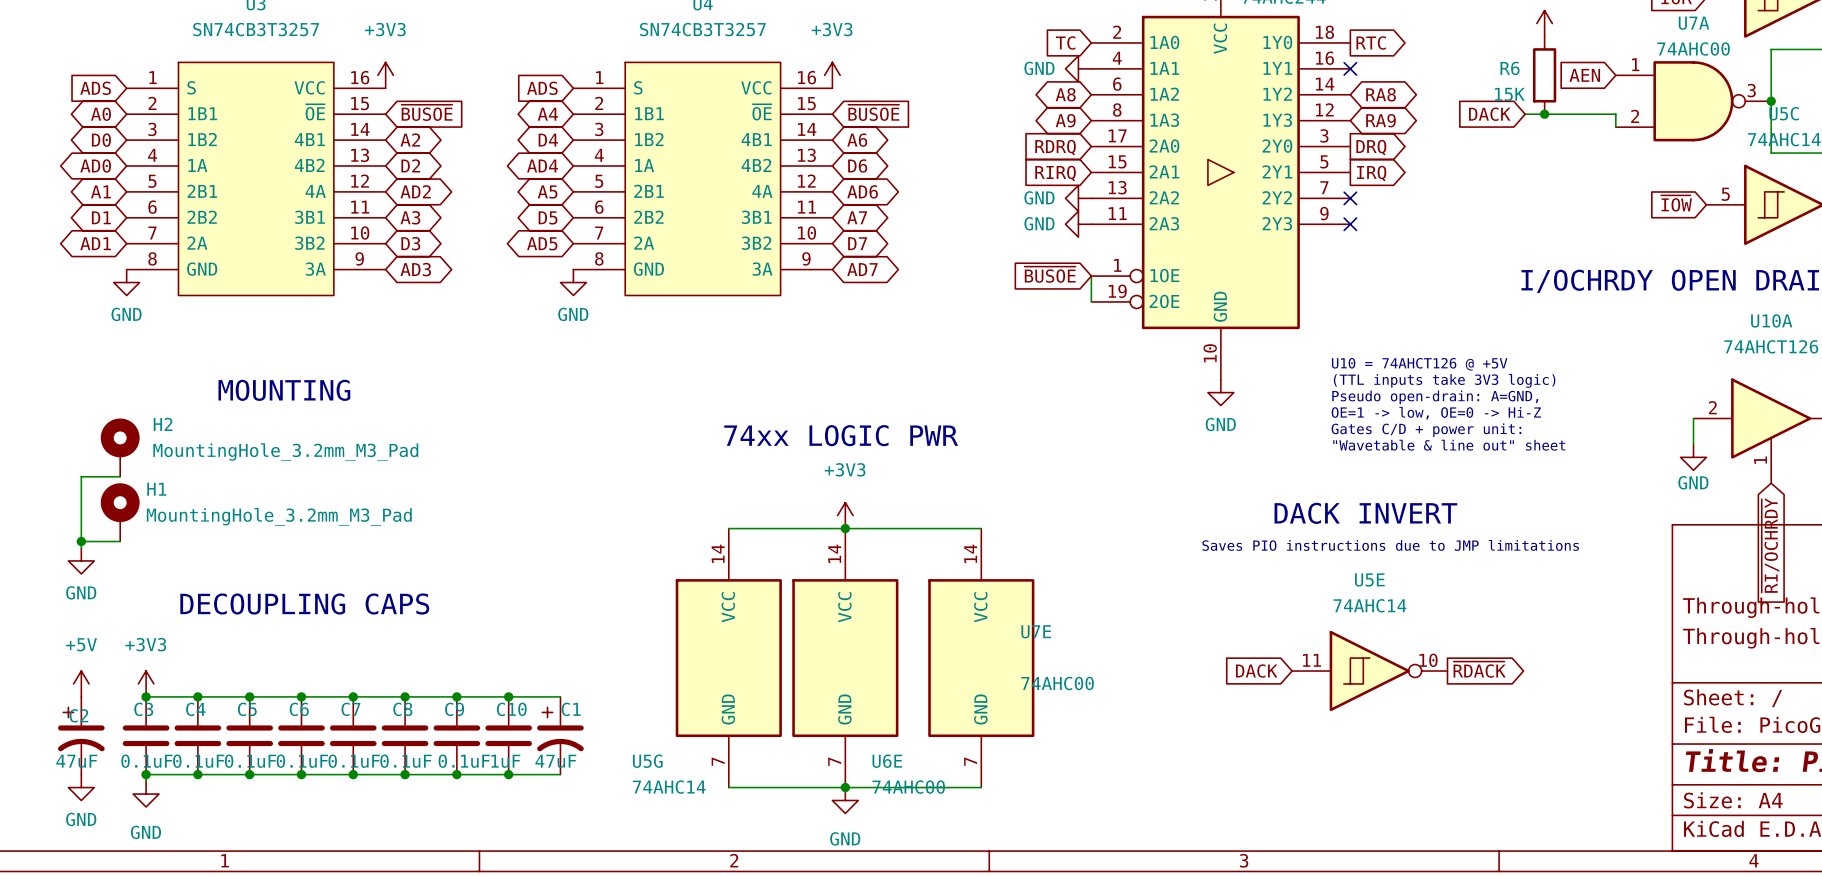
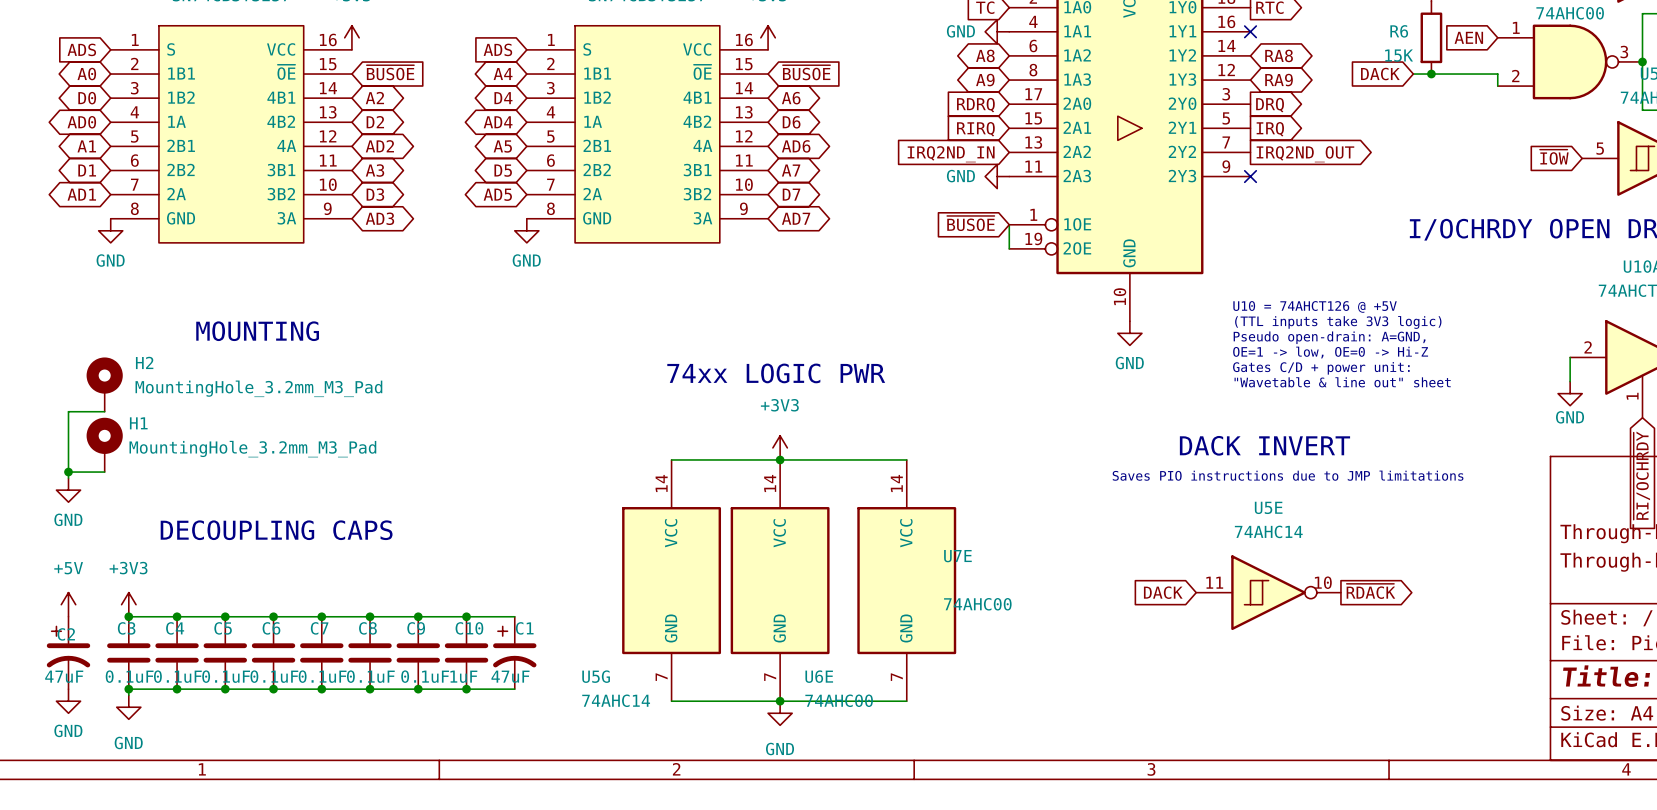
power symbol: GND (1078, 198) -> none
no-connect mark: (1350, 198) -> none
global label: none -> IRQ2ND_IN (951, 154)
global label: none -> IRQ2ND_OUT (1305, 154)

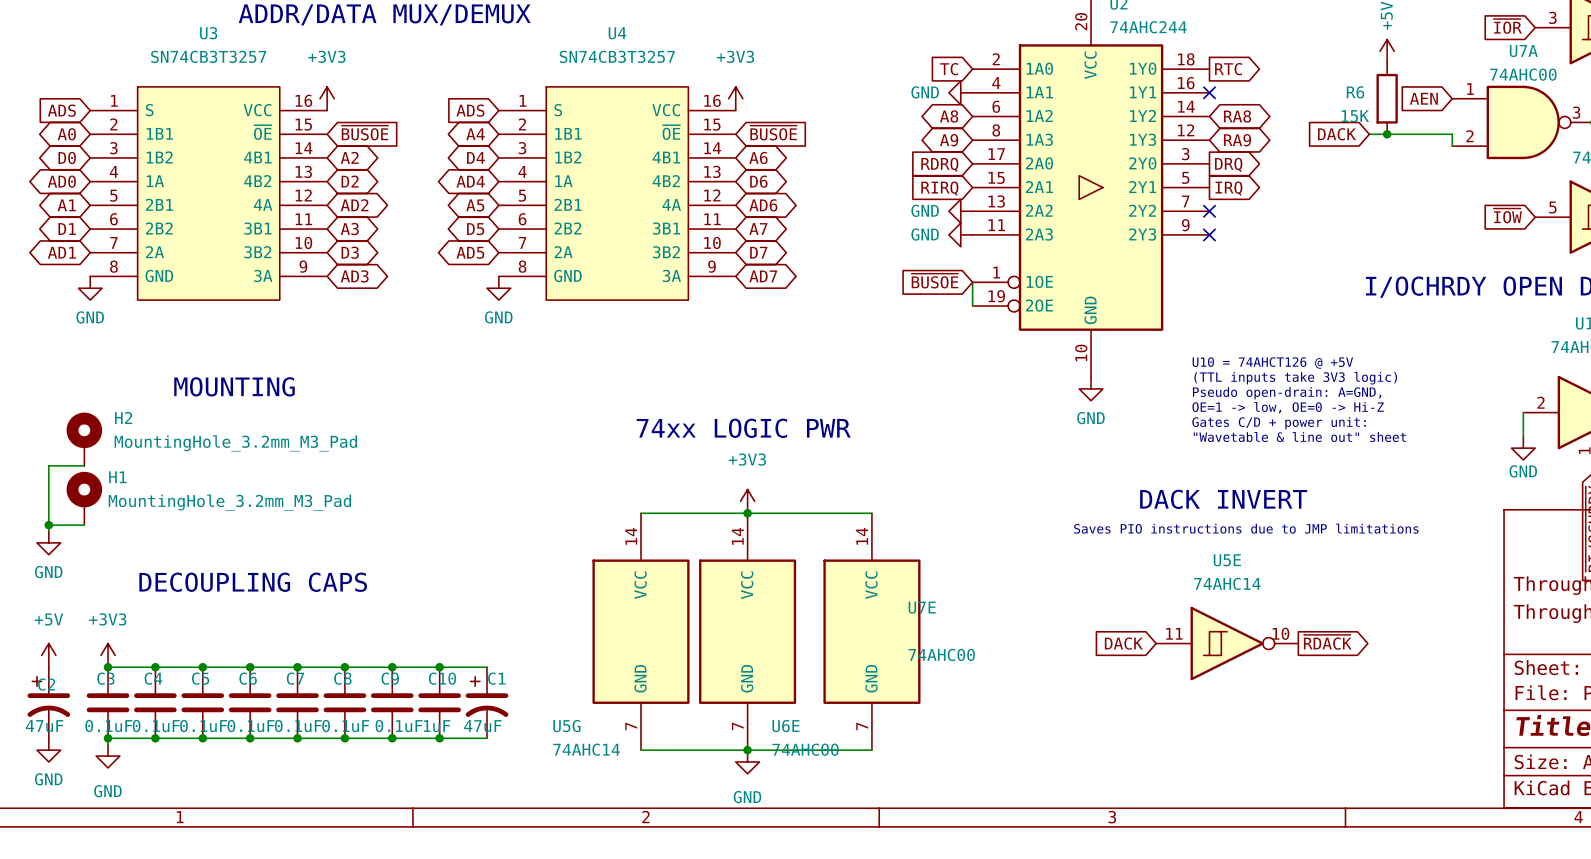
power symbol: none -> GND (960, 211)
no-connect mark: none -> (1209, 211)
global label: IRQ2ND_IN (951, 154) -> none
global label: IRQ2ND_OUT (1305, 154) -> none

